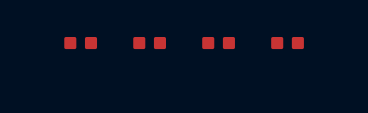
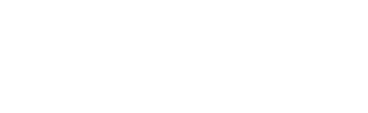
part: (80, 43) -> none
part: (149, 43) -> none
part: (218, 43) -> none
part: (287, 43) -> none

